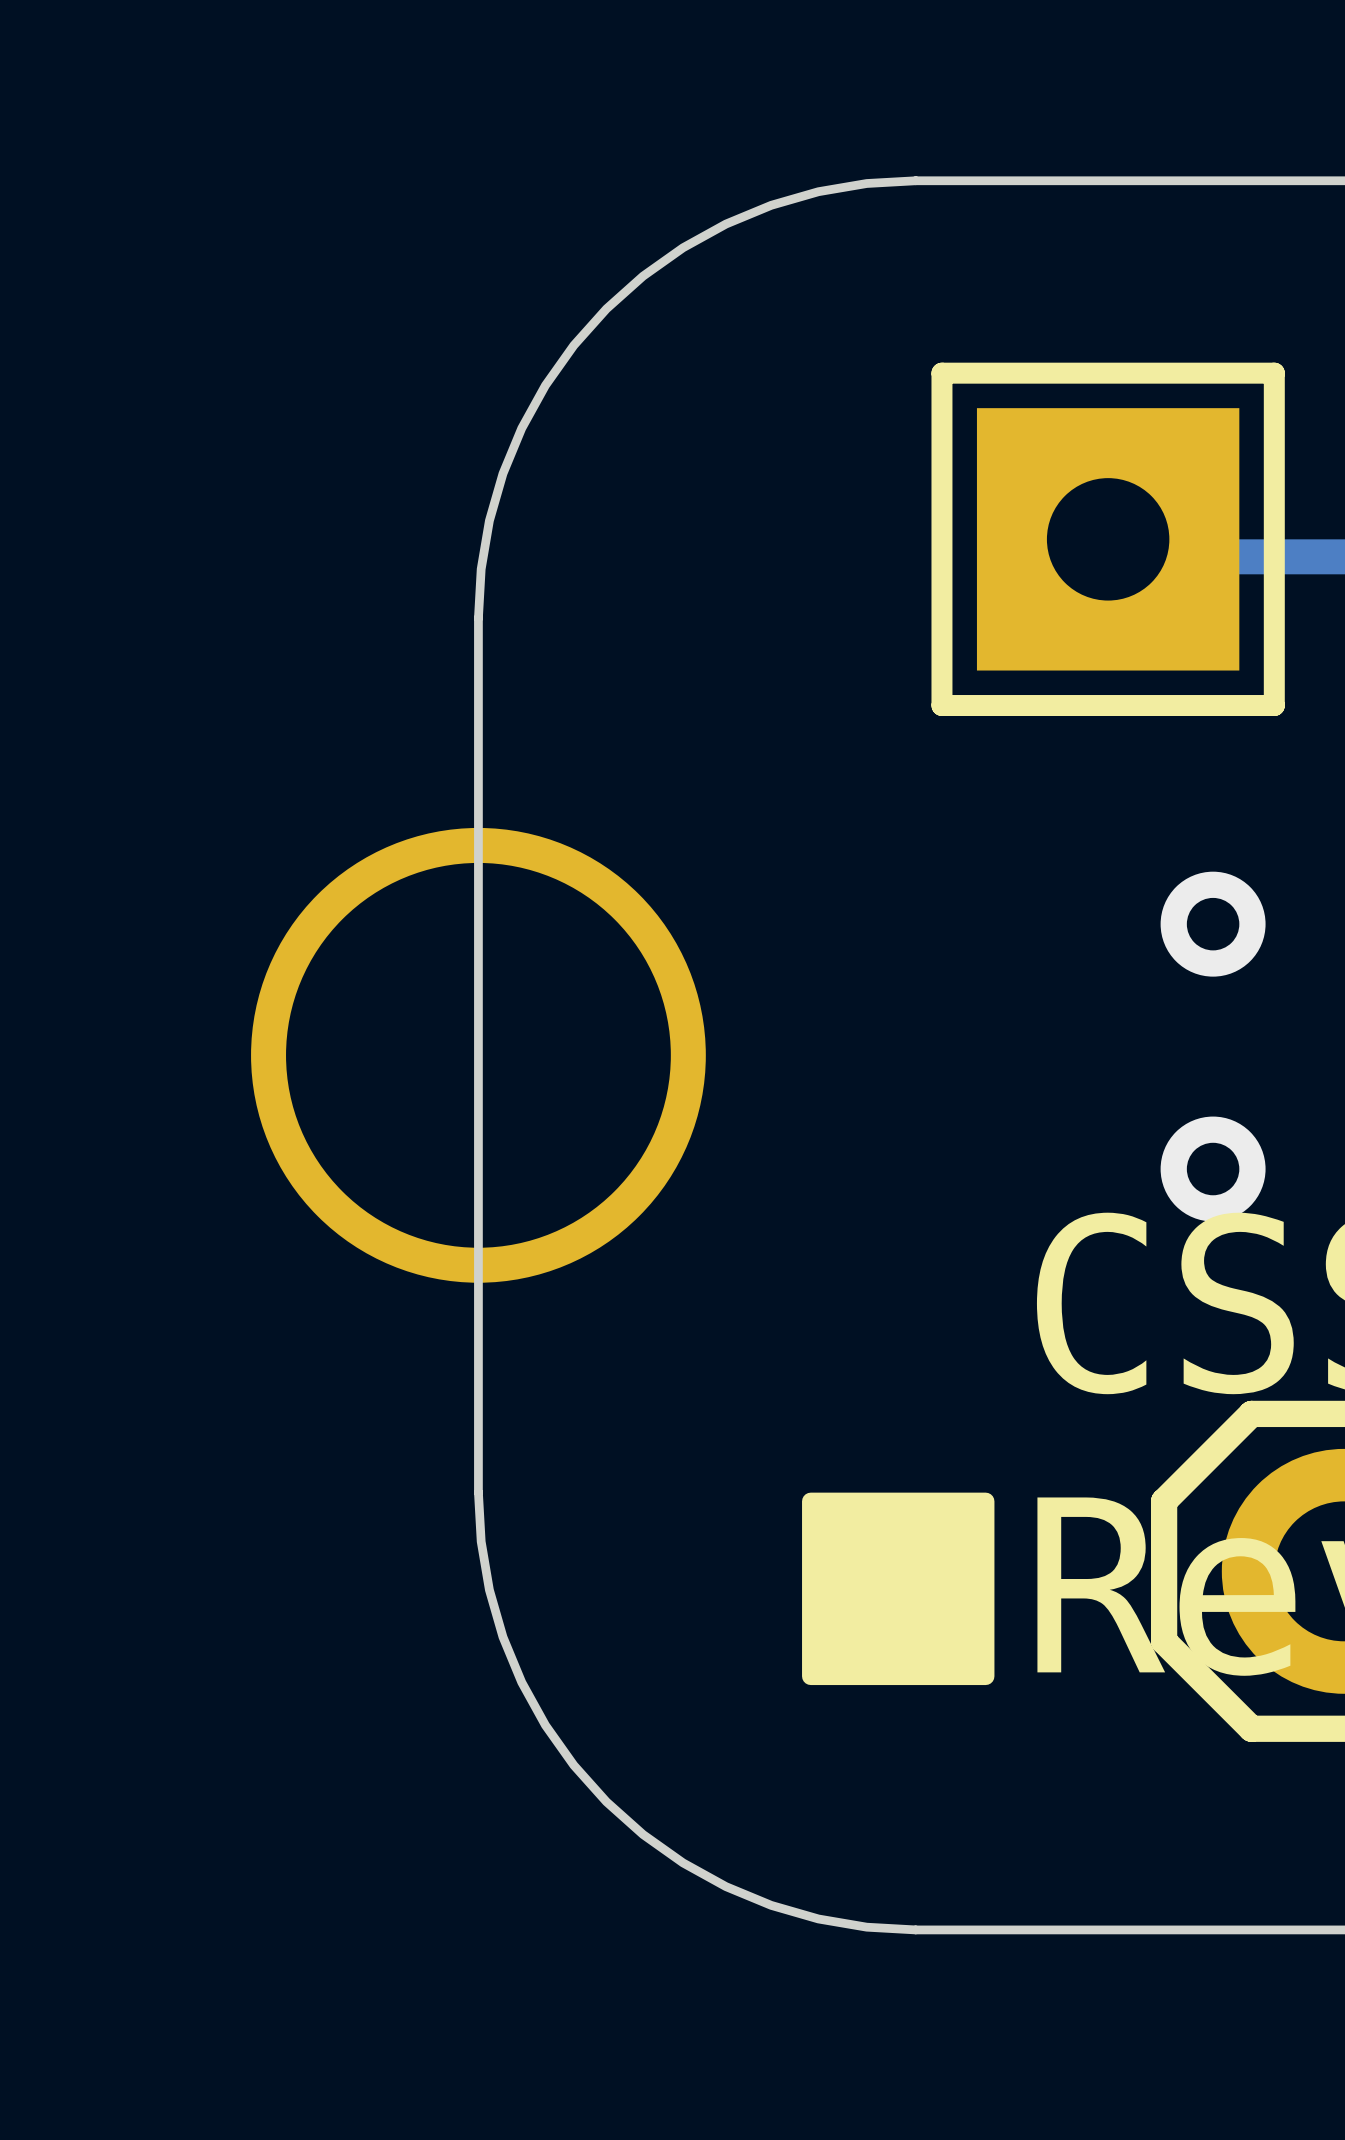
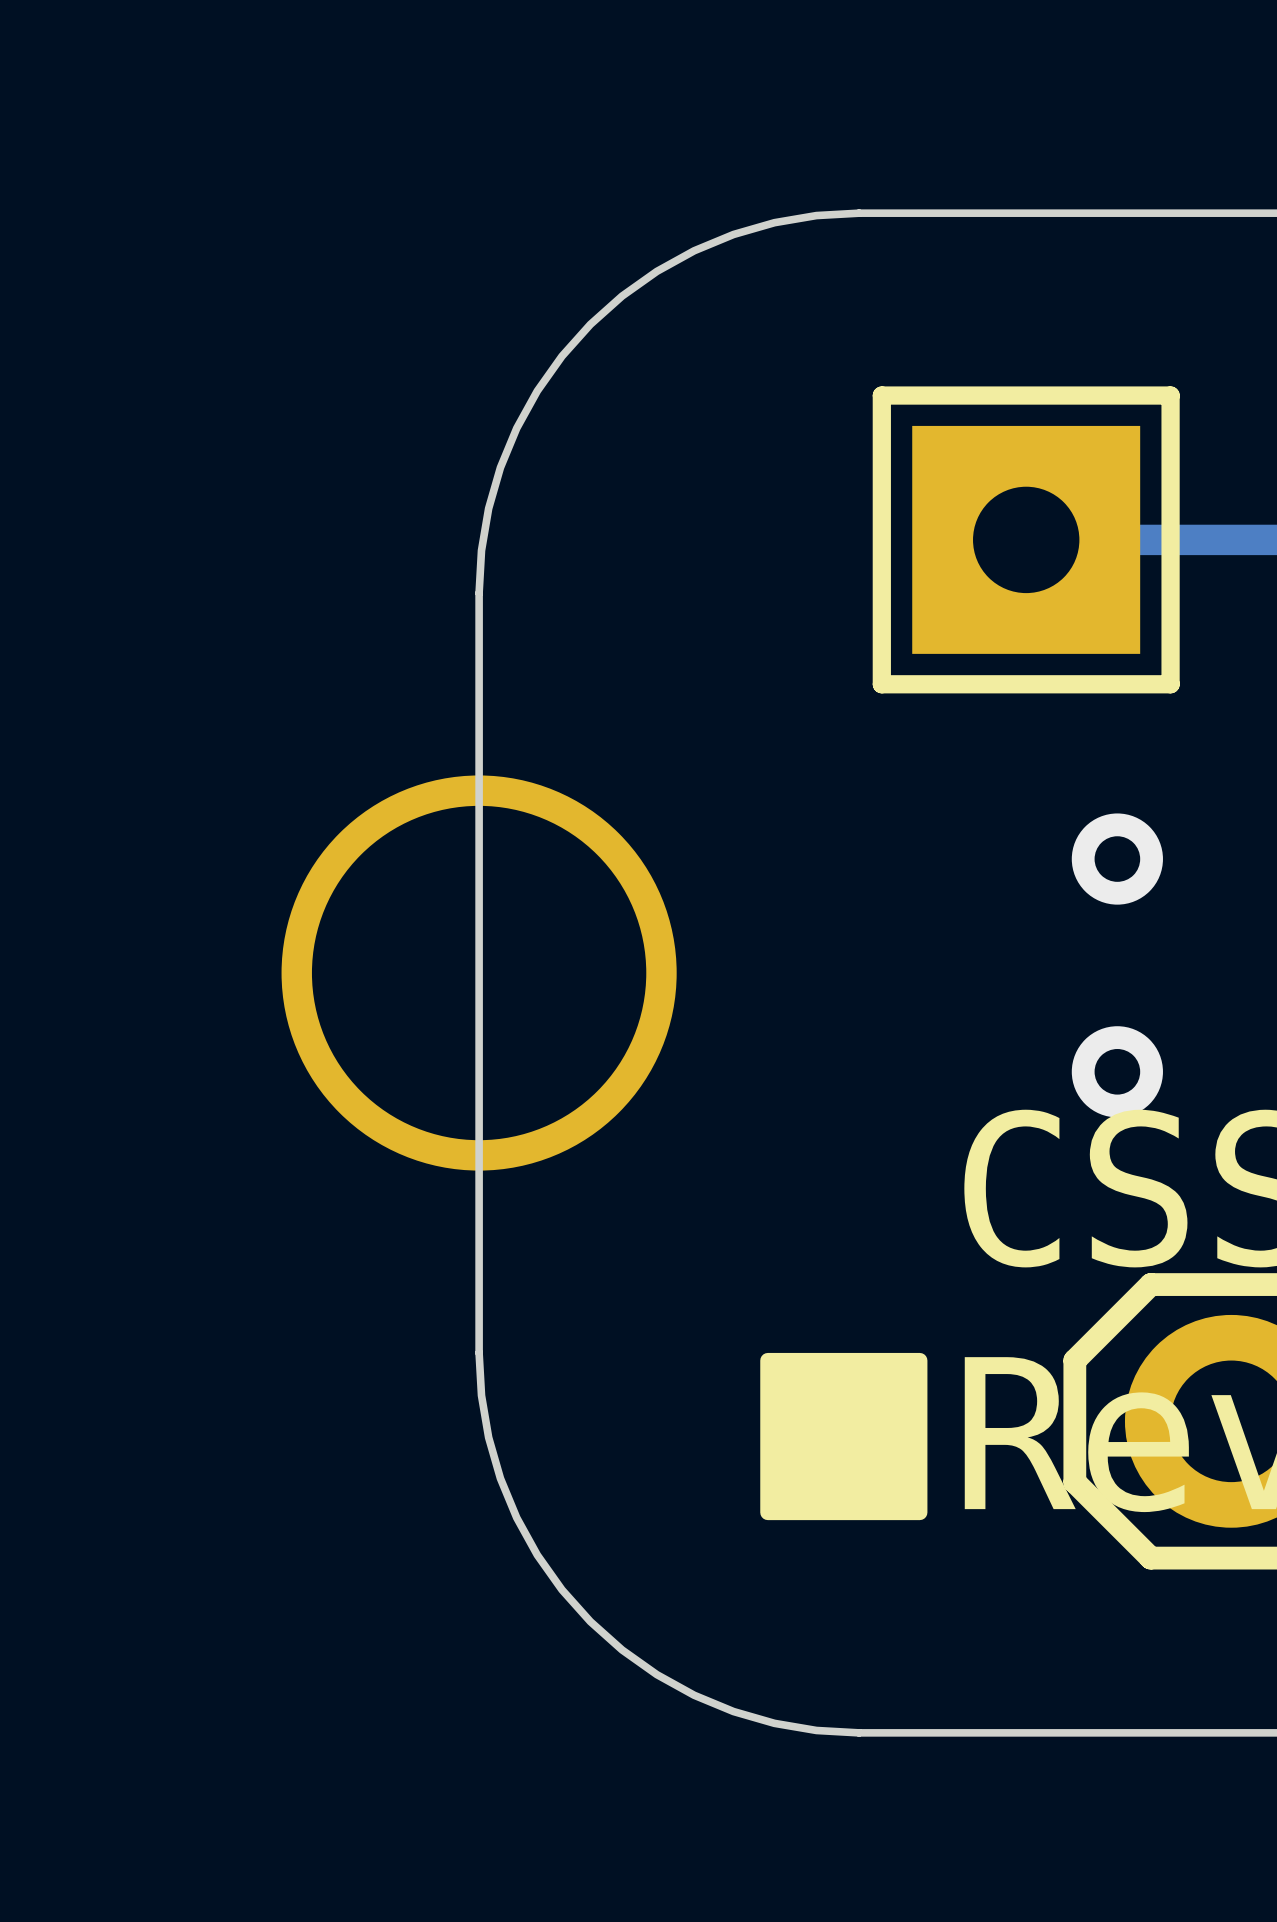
part position: (1108, 539) -> (1026, 539)

